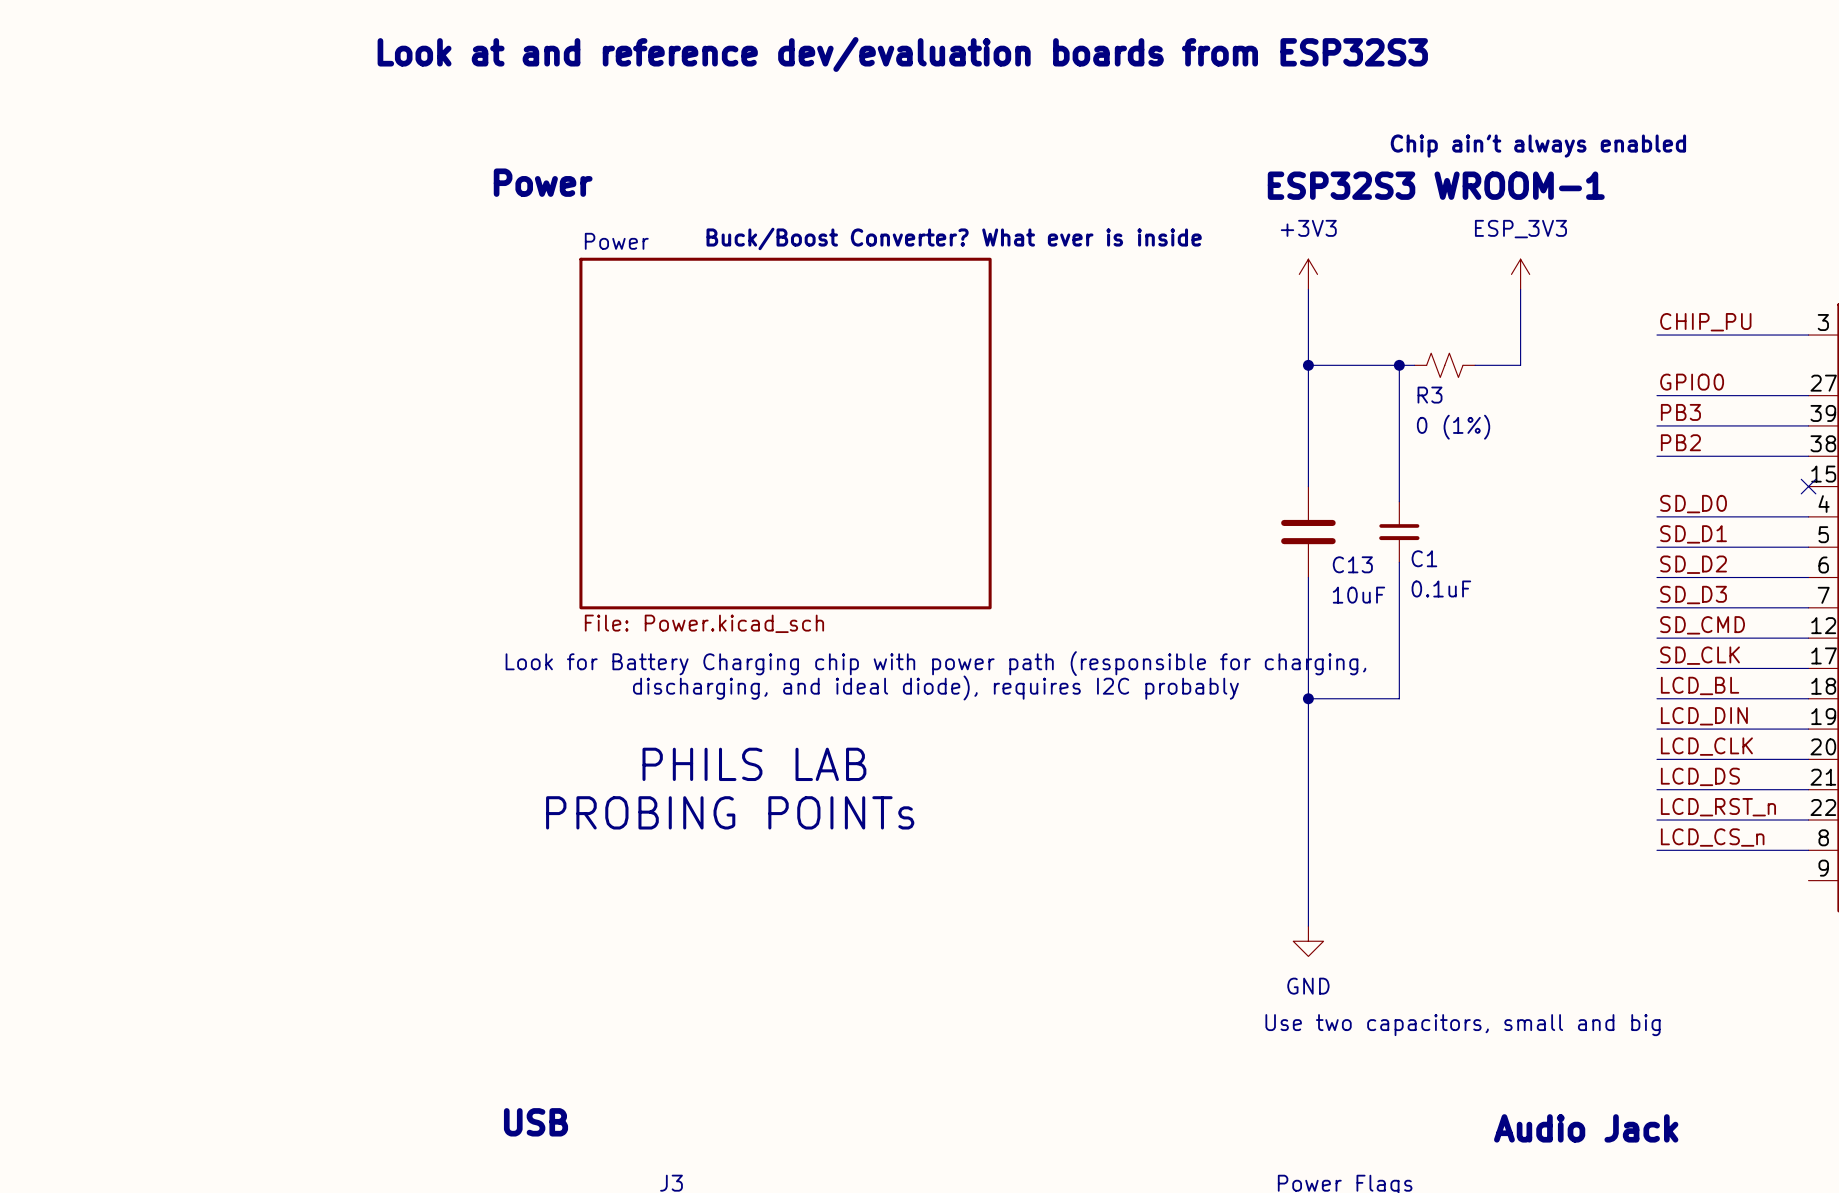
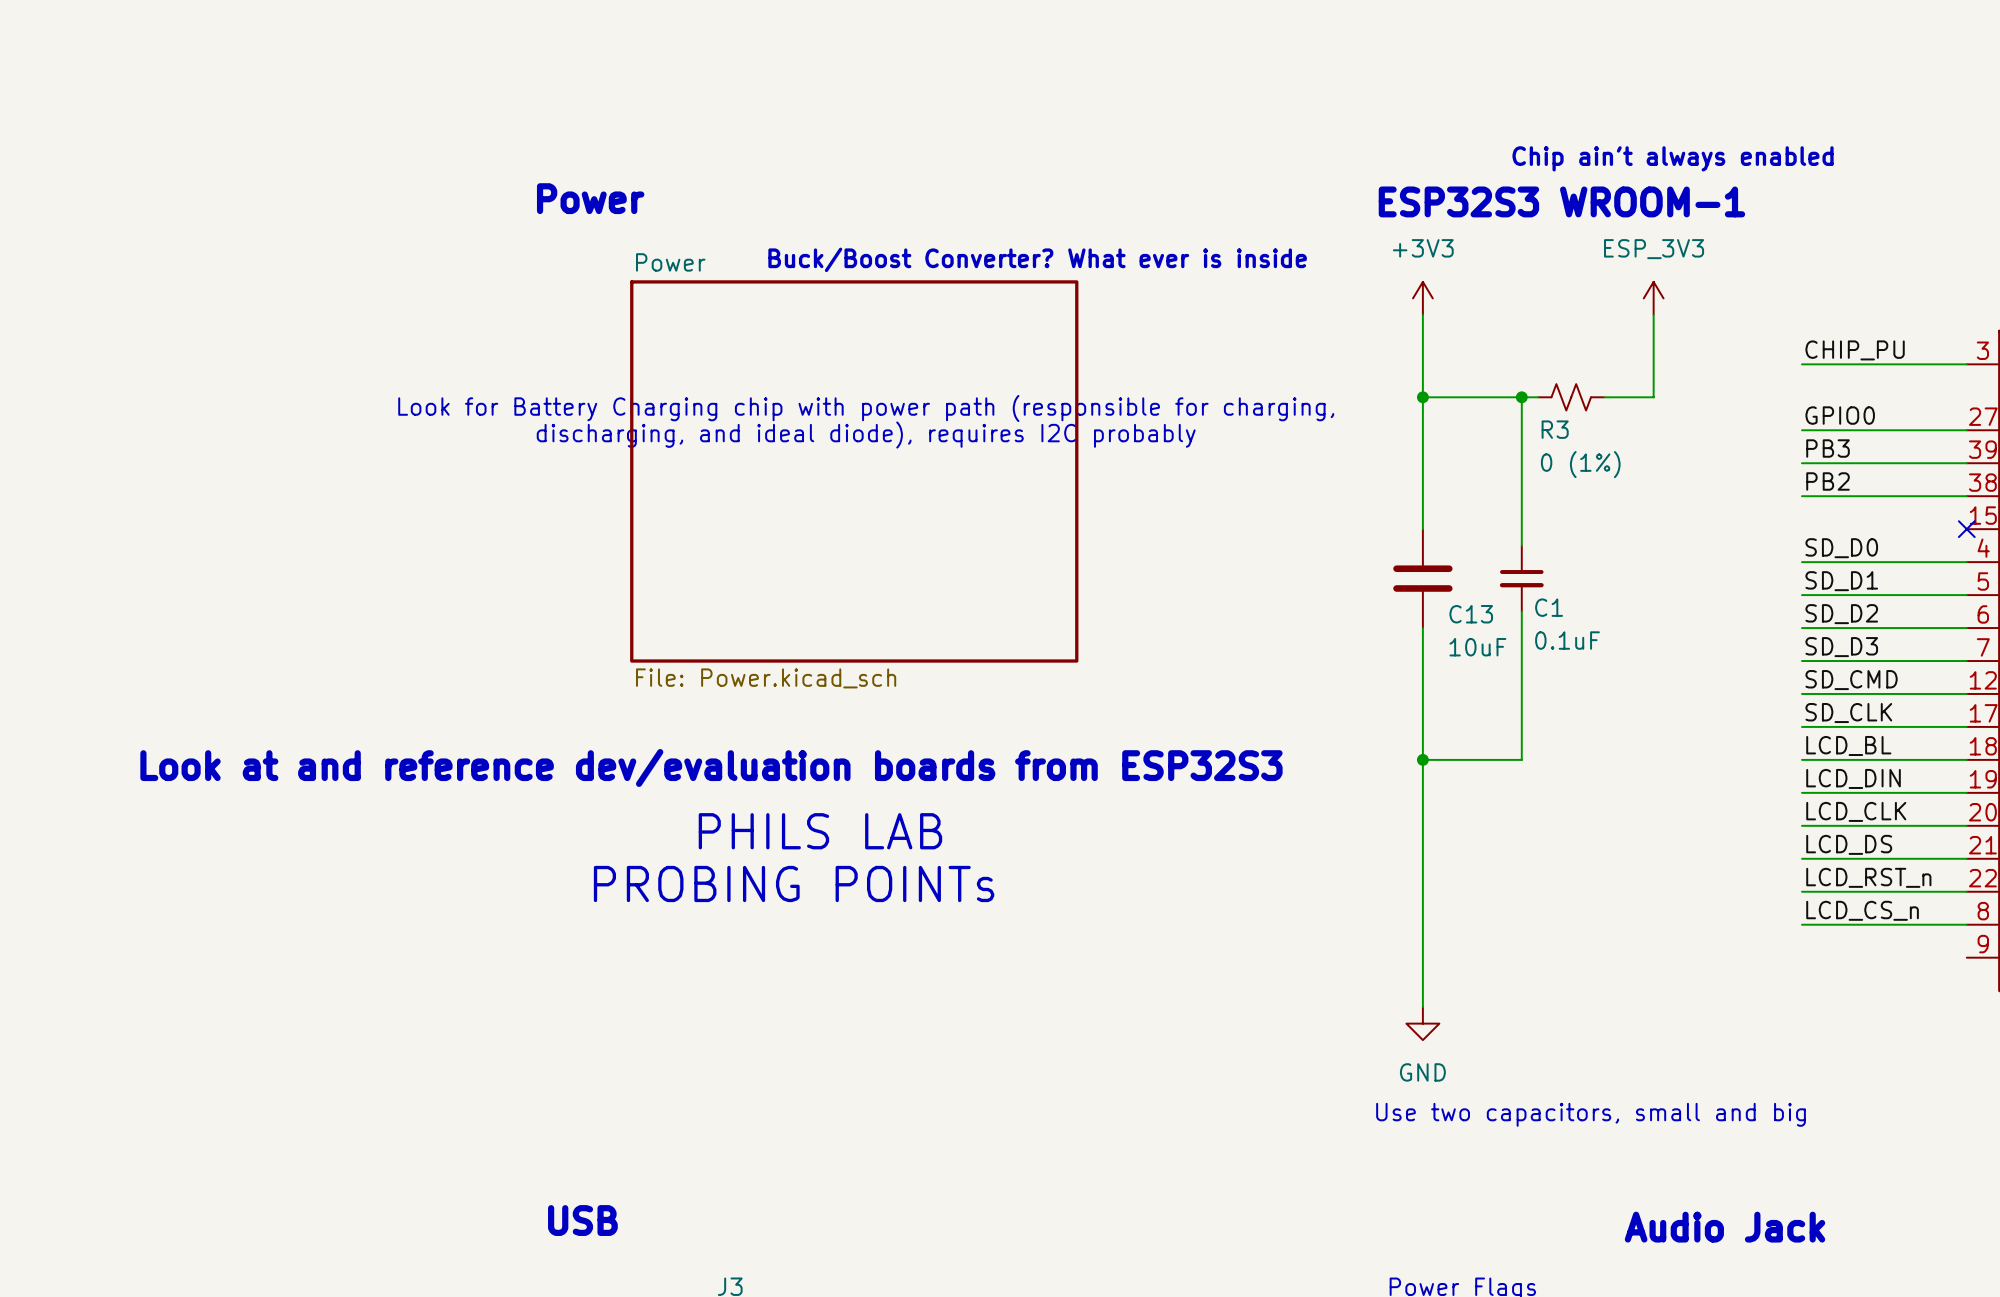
text: Look at and reference dev/evaluation boards from ESP32S3 (902, 54) -> none
text: none -> Look for Battery Charging chip with power path (responsible for charging, (866, 408)
text: none -> discharging, and ideal diode), requires I2C probably (866, 435)
text: Look for Battery Charging chip with power path (responsible for charging, (935, 663) -> none
text: discharging, and ideal diode), requires I2C probably (935, 687) -> none
text: none -> Look at and reference dev/evaluation boards from ESP32S3 (711, 767)

